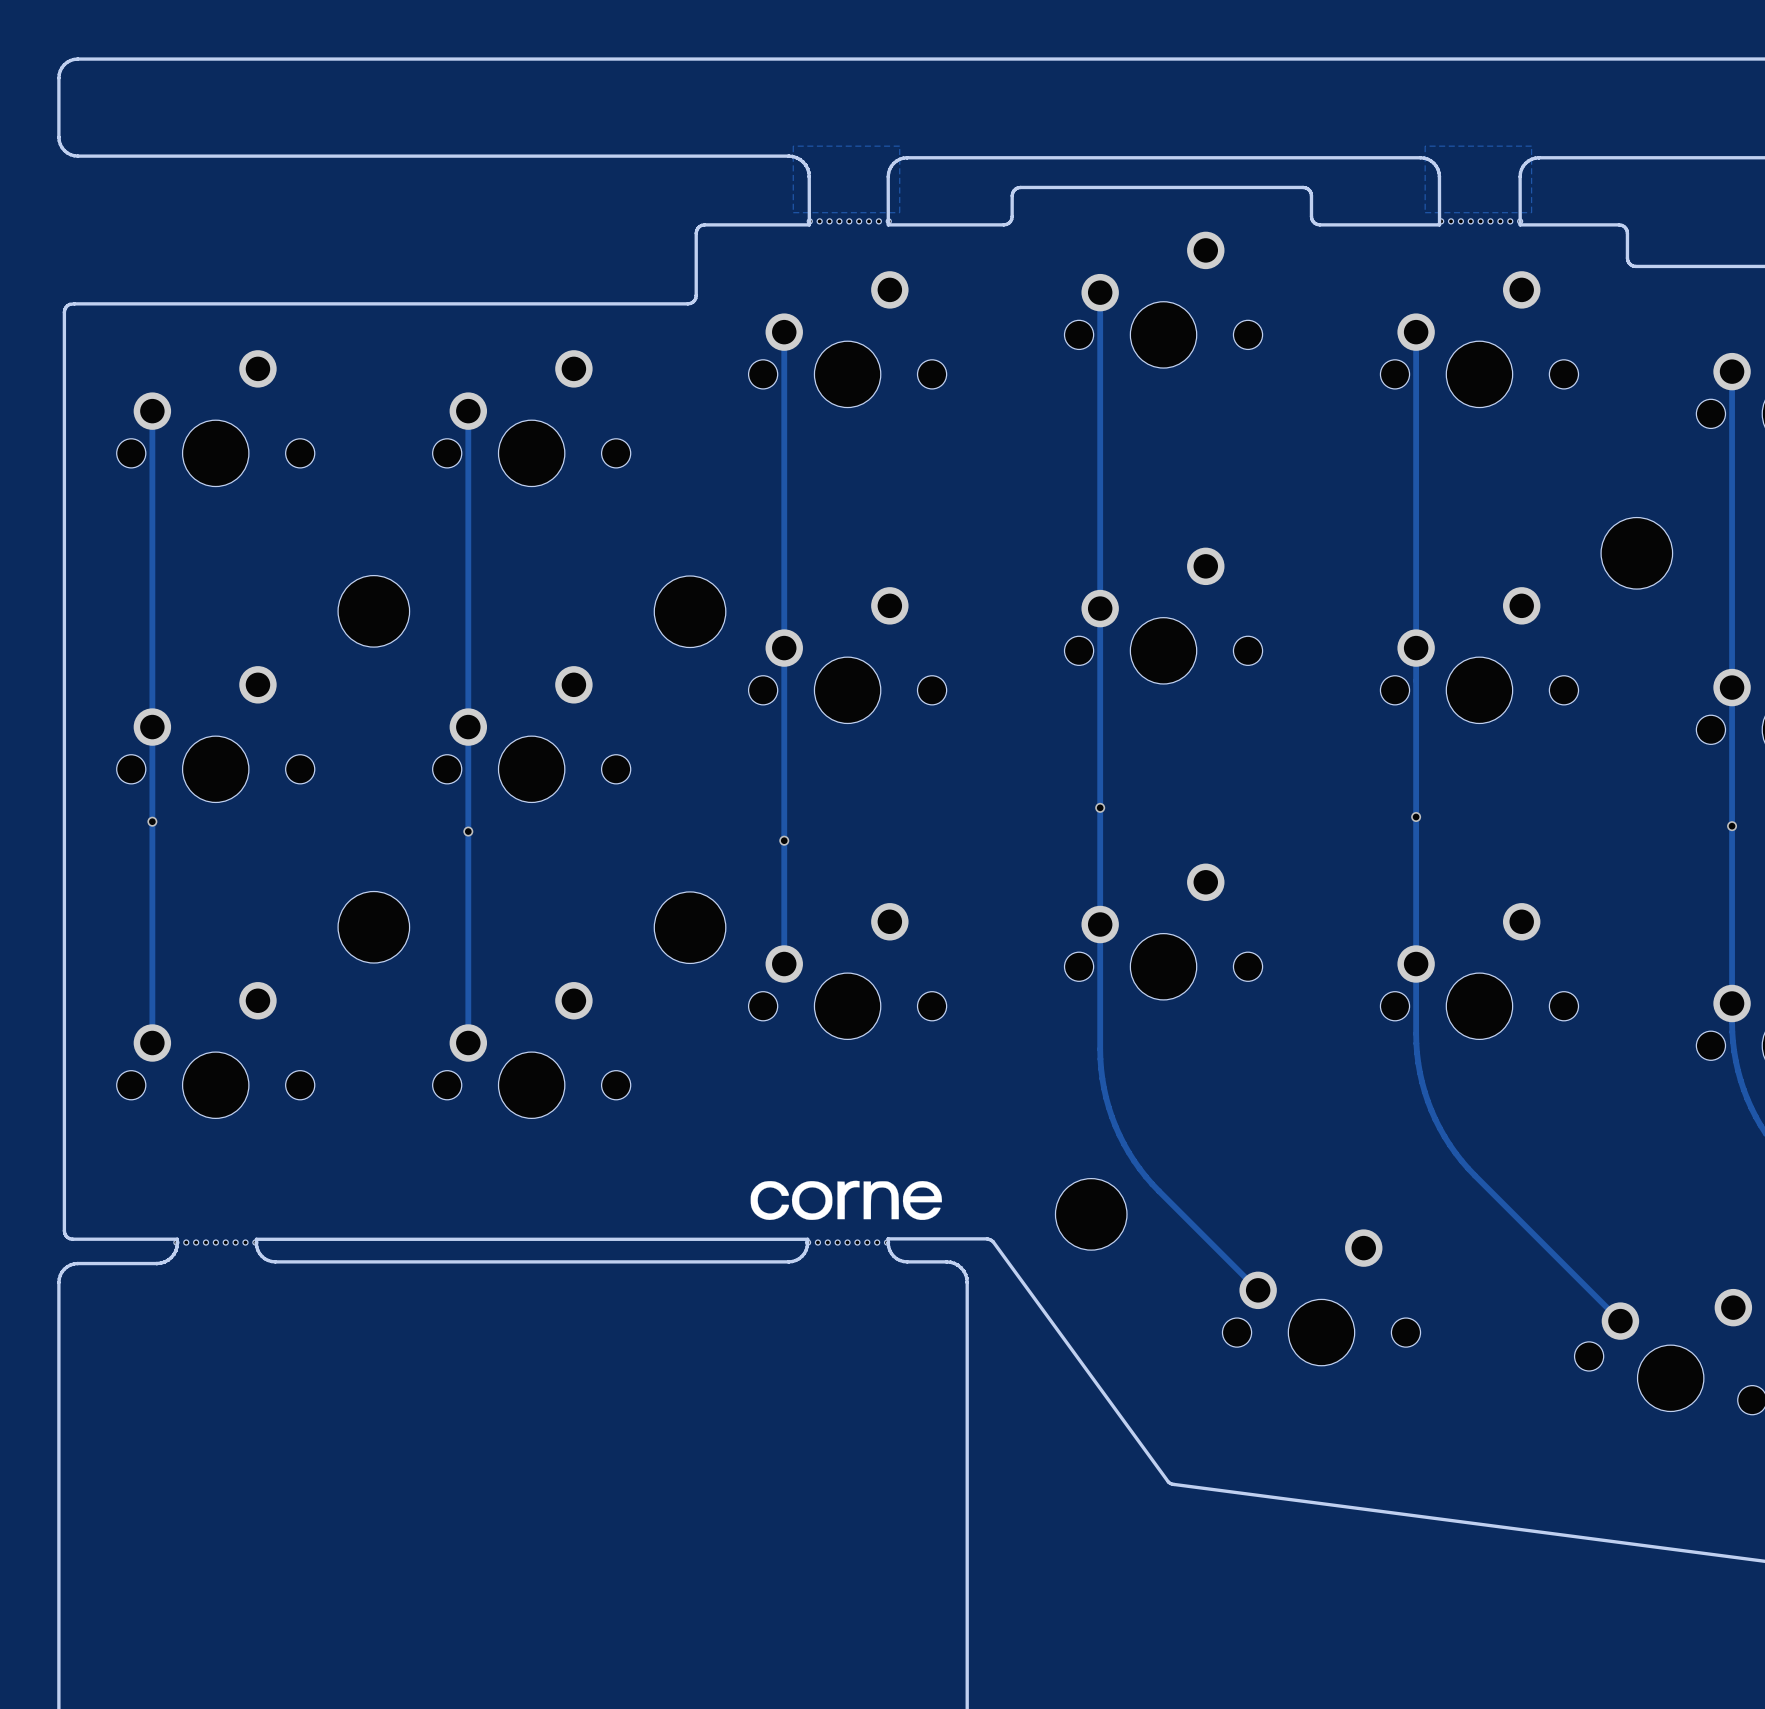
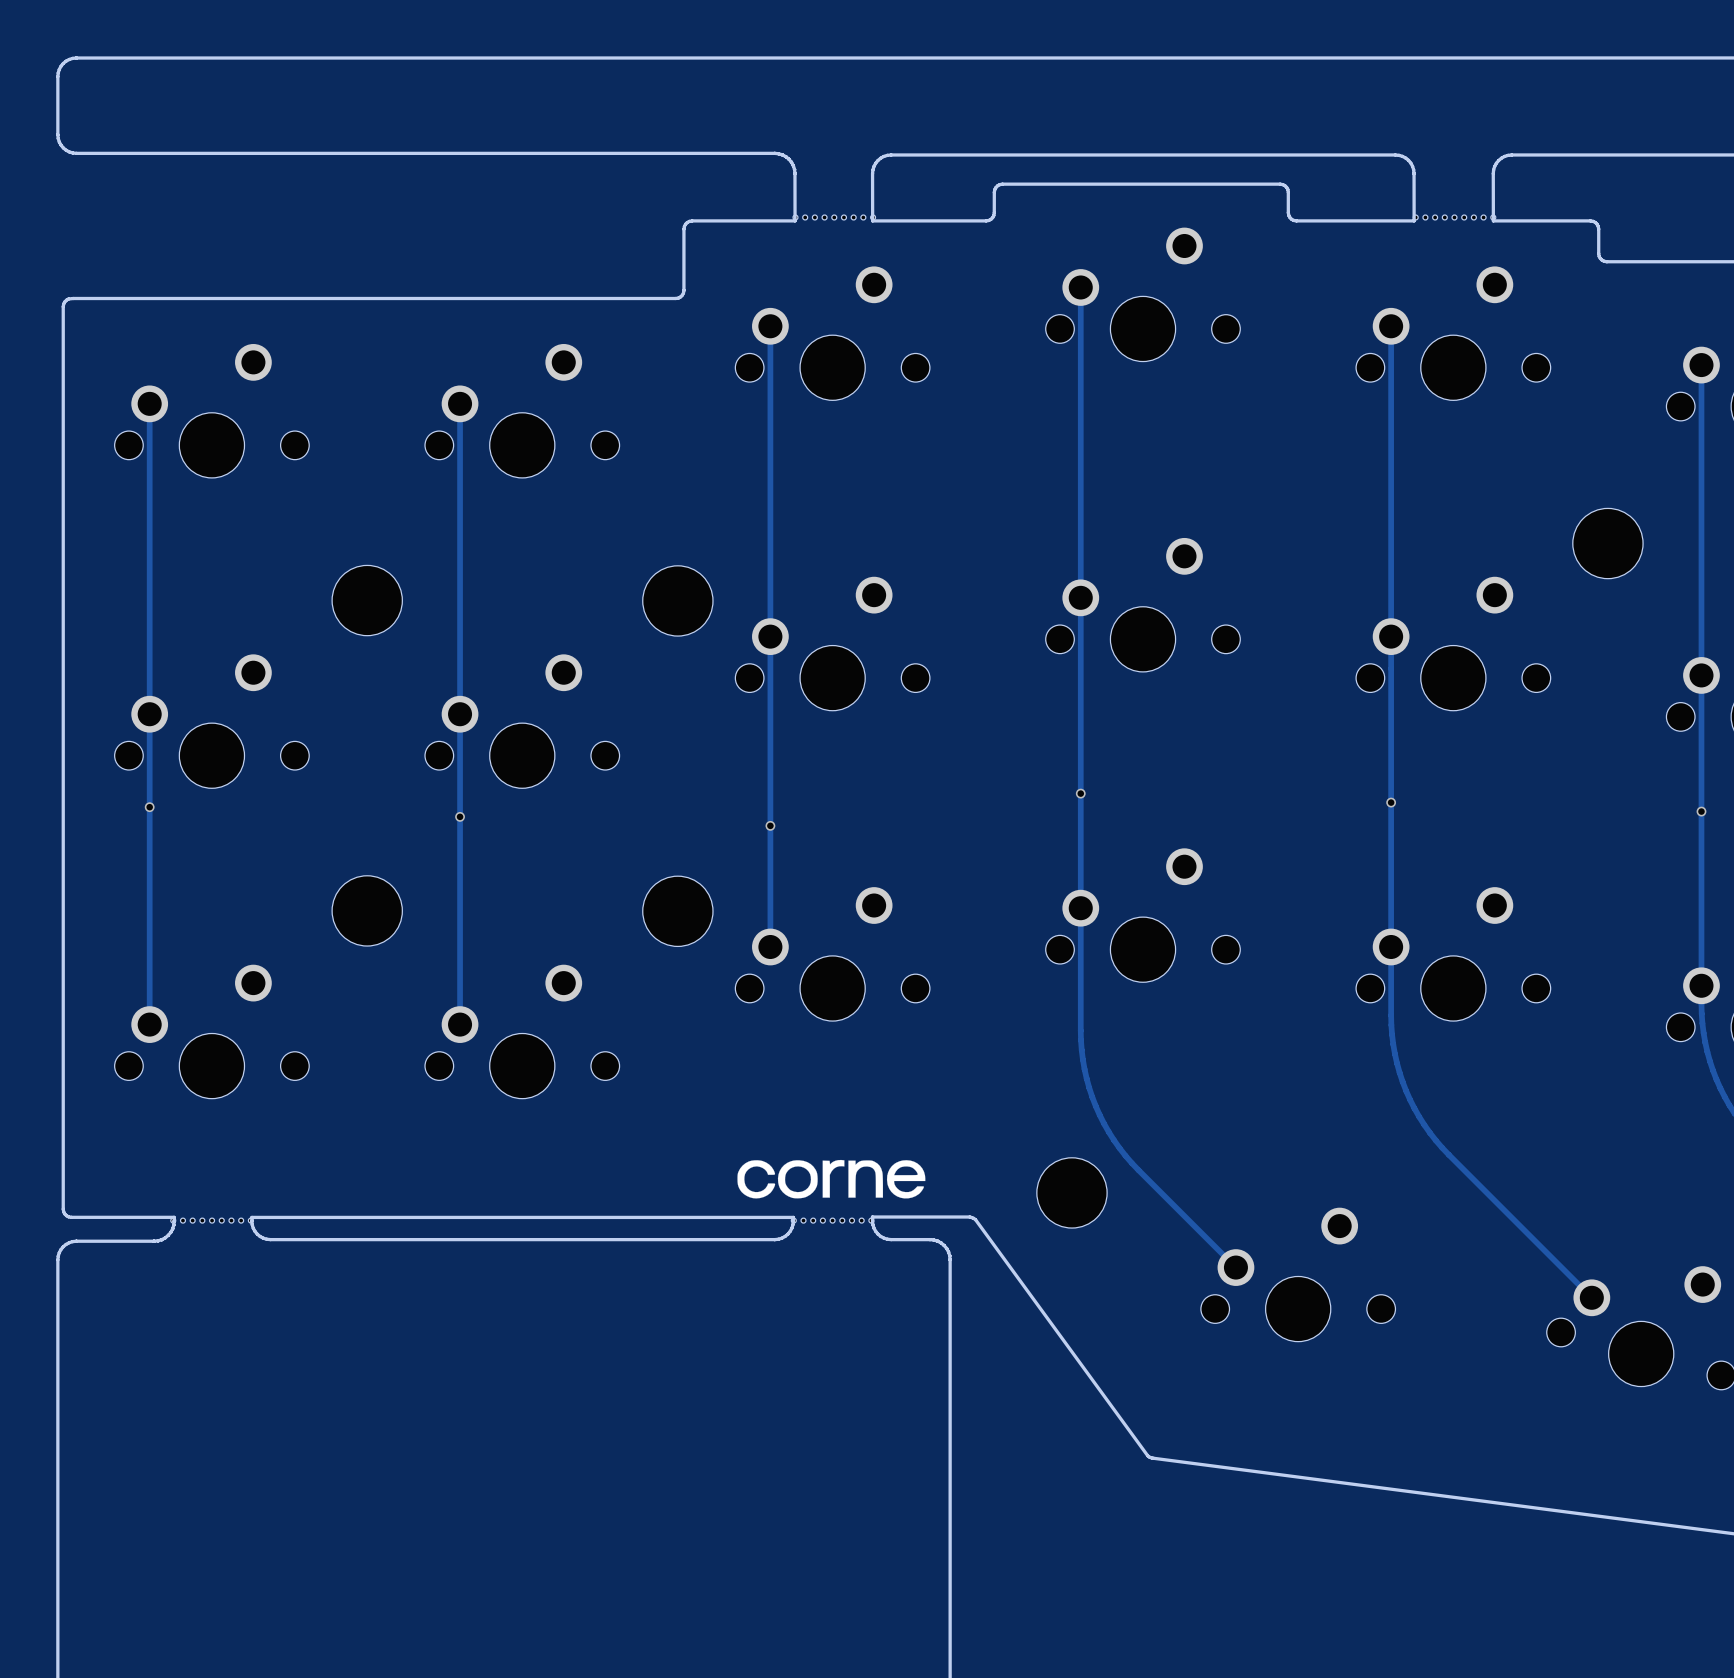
zone outline: (793, 146) (793, 212) (899, 212) (899, 146) (793, 146) -> none
zone outline: (1425, 146) (1531, 146) (1531, 212) (1425, 212) (1425, 146) -> none

